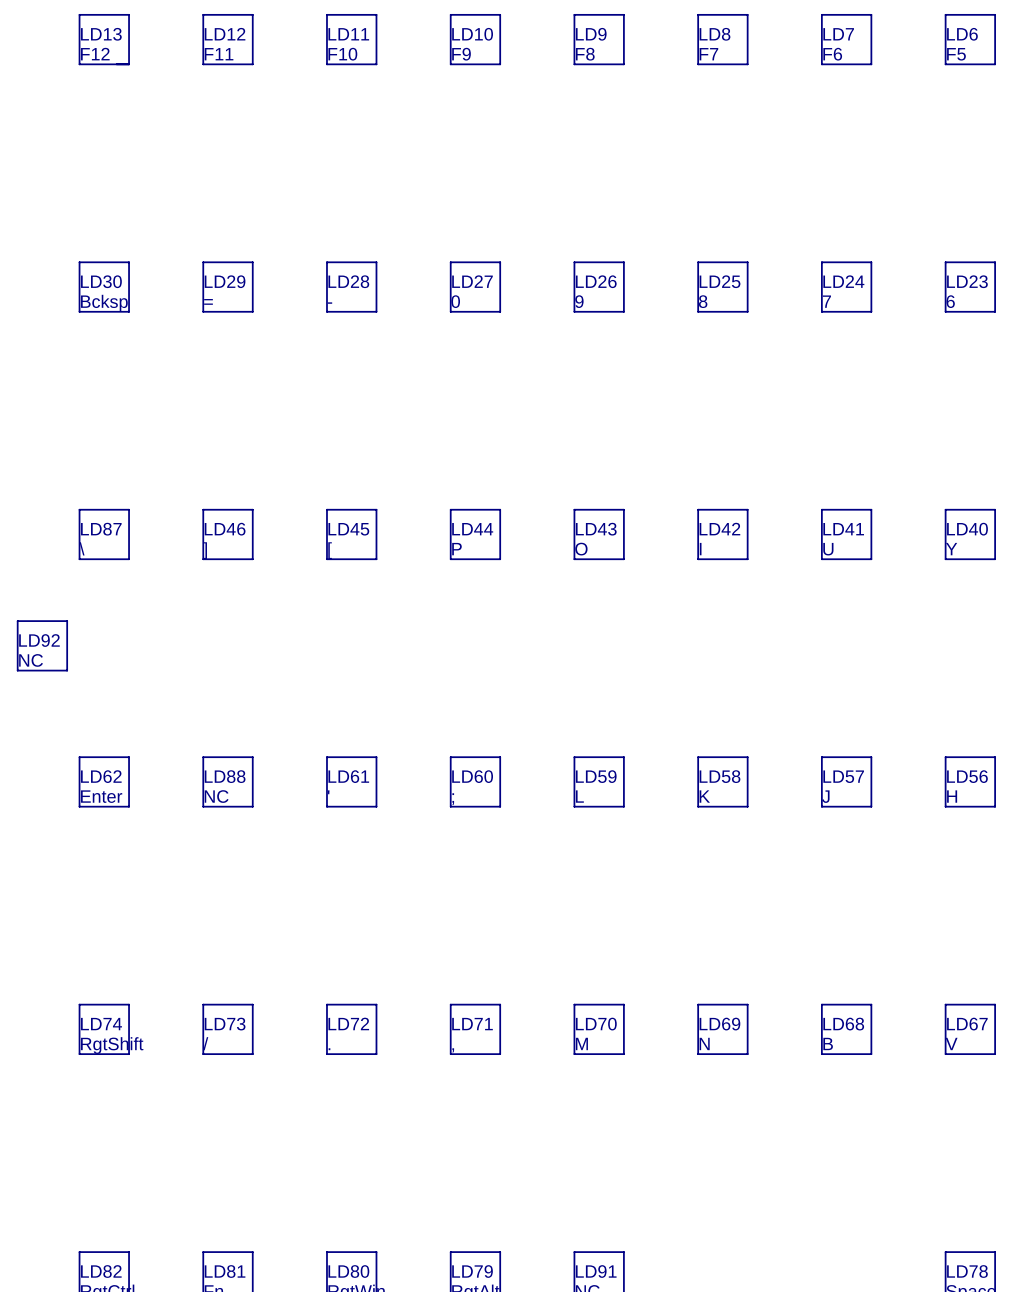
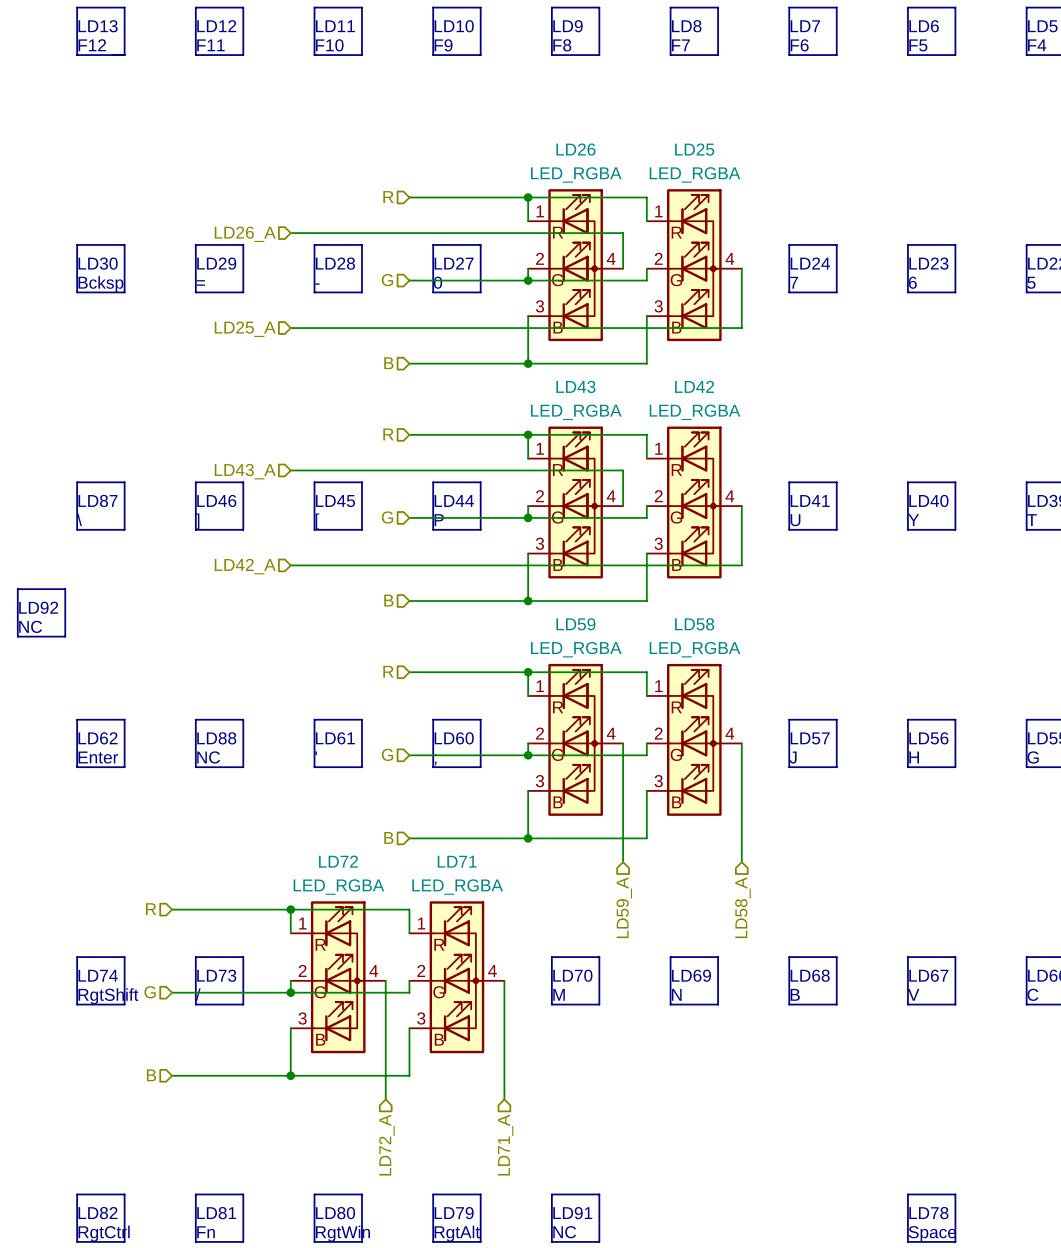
hierarchical label: none -> R (388, 197)
wire: none -> (409, 197) (646, 197) (646, 221)
wire: none -> (528, 197) (528, 221)
junction: none -> (528, 197)
wire: none -> (290, 233) (623, 233) (623, 268)
hierarchical label: none -> LD26_A (245, 234)
line: (574, 262) (623, 262) (623, 311) (574, 311) (574, 262) -> none
line: (698, 262) (698, 311) (747, 311) (747, 262) (698, 262) -> none
text: LD26 (596, 281) -> none
text: LD25 (720, 281) -> none
LD26: none -> LED_RGBA (575, 265)
LD25: none -> LED_RGBA (694, 265)
wire: none -> (528, 268) (528, 280)
wire: none -> (646, 268) (646, 280) (409, 280)
wire: none -> (741, 268) (741, 328) (290, 328)
hierarchical label: none -> G (387, 280)
junction: none -> (528, 280)
text: 9 (579, 301) -> none
text: 8 (703, 301) -> none
wire: none -> (528, 316) (528, 363)
wire: none -> (646, 316) (646, 363) (409, 363)
hierarchical label: none -> LD25_A (245, 329)
hierarchical label: none -> B (388, 363)
junction: none -> (528, 363)
hierarchical label: none -> R (388, 434)
wire: none -> (409, 434) (646, 434) (646, 458)
wire: none -> (528, 434) (528, 458)
junction: none -> (528, 434)
wire: none -> (290, 470) (623, 470) (623, 506)
hierarchical label: none -> LD43_A (245, 471)
line: (574, 509) (574, 559) (623, 559) (623, 509) (574, 509) -> none
line: (698, 509) (698, 559) (747, 559) (747, 509) (698, 509) -> none
text: LD43 (596, 529) -> none
text: LD42 (719, 529) -> none
LD43: none -> LED_RGBA (575, 502)
LD42: none -> LED_RGBA (694, 502)
wire: none -> (528, 506) (528, 517)
wire: none -> (646, 506) (646, 517) (409, 517)
wire: none -> (741, 506) (741, 565) (290, 565)
hierarchical label: none -> G (387, 517)
junction: none -> (528, 517)
text: O (581, 549) -> none
text: I (700, 549) -> none
wire: none -> (528, 553) (528, 601)
wire: none -> (646, 553) (646, 601) (409, 601)
hierarchical label: none -> LD42_A (245, 566)
hierarchical label: none -> B (388, 600)
junction: none -> (528, 601)
hierarchical label: none -> R (388, 671)
wire: none -> (409, 672) (646, 672) (646, 695)
wire: none -> (528, 672) (528, 695)
junction: none -> (528, 672)
line: (574, 757) (574, 806) (623, 806) (623, 757) (574, 757) -> none
line: (698, 757) (698, 806) (747, 806) (747, 757) (698, 757) -> none
text: LD59 (596, 776) -> none
text: LD58 (720, 776) -> none
LD59: none -> LED_RGBA (575, 739)
LD58: none -> LED_RGBA (694, 739)
wire: none -> (528, 743) (528, 755)
wire: none -> (623, 743) (623, 862)
wire: none -> (646, 743) (646, 755) (409, 755)
wire: none -> (741, 743) (741, 862)
hierarchical label: none -> G (387, 754)
junction: none -> (528, 755)
text: L (579, 796) -> none
text: K (704, 796) -> none
wire: none -> (528, 790) (528, 838)
wire: none -> (646, 790) (646, 838) (409, 838)
hierarchical label: none -> B (388, 837)
junction: none -> (528, 838)
hierarchical label: none -> LD59_A (624, 907)
hierarchical label: none -> LD58_A (742, 907)
hierarchical label: none -> R (151, 909)
wire: none -> (172, 909) (409, 909) (409, 933)
wire: none -> (290, 909) (290, 933)
junction: none -> (290, 909)
line: (326, 1004) (376, 1004) (376, 1054) (326, 1054) (326, 1004) -> none
line: (450, 1004) (450, 1054) (500, 1054) (500, 1004) (450, 1004) -> none
text: LD72 (348, 1023) -> none
text: LD71 (472, 1024) -> none
LD72: none -> LED_RGBA (338, 977)
LD71: none -> LED_RGBA (456, 977)
wire: none -> (290, 980) (290, 992)
wire: none -> (385, 980) (385, 1099)
wire: none -> (409, 980) (409, 992) (172, 992)
wire: none -> (504, 980) (504, 1099)
hierarchical label: none -> G (150, 992)
junction: none -> (290, 992)
text: . (329, 1049) -> none
text: , (453, 1050) -> none
wire: none -> (290, 1028) (290, 1075)
wire: none -> (409, 1028) (409, 1075) (172, 1075)
hierarchical label: none -> B (151, 1075)
junction: none -> (290, 1075)
hierarchical label: none -> LD72_A (386, 1145)
hierarchical label: none -> LD71_A (505, 1145)

